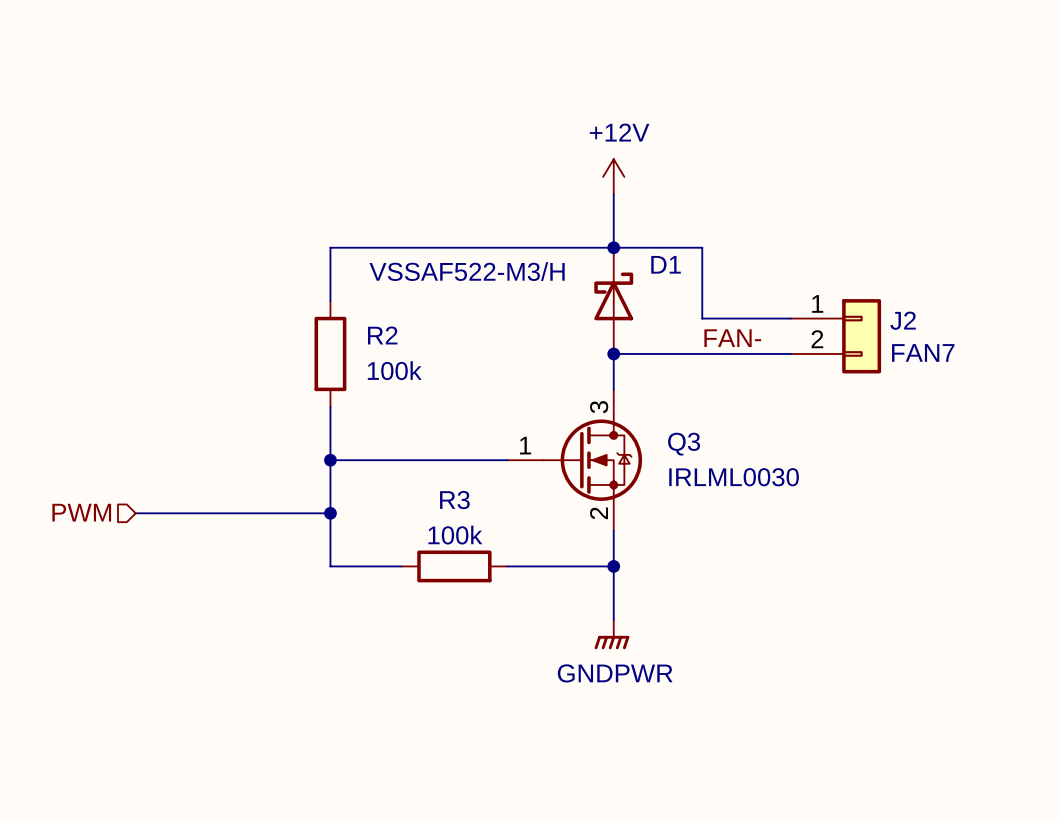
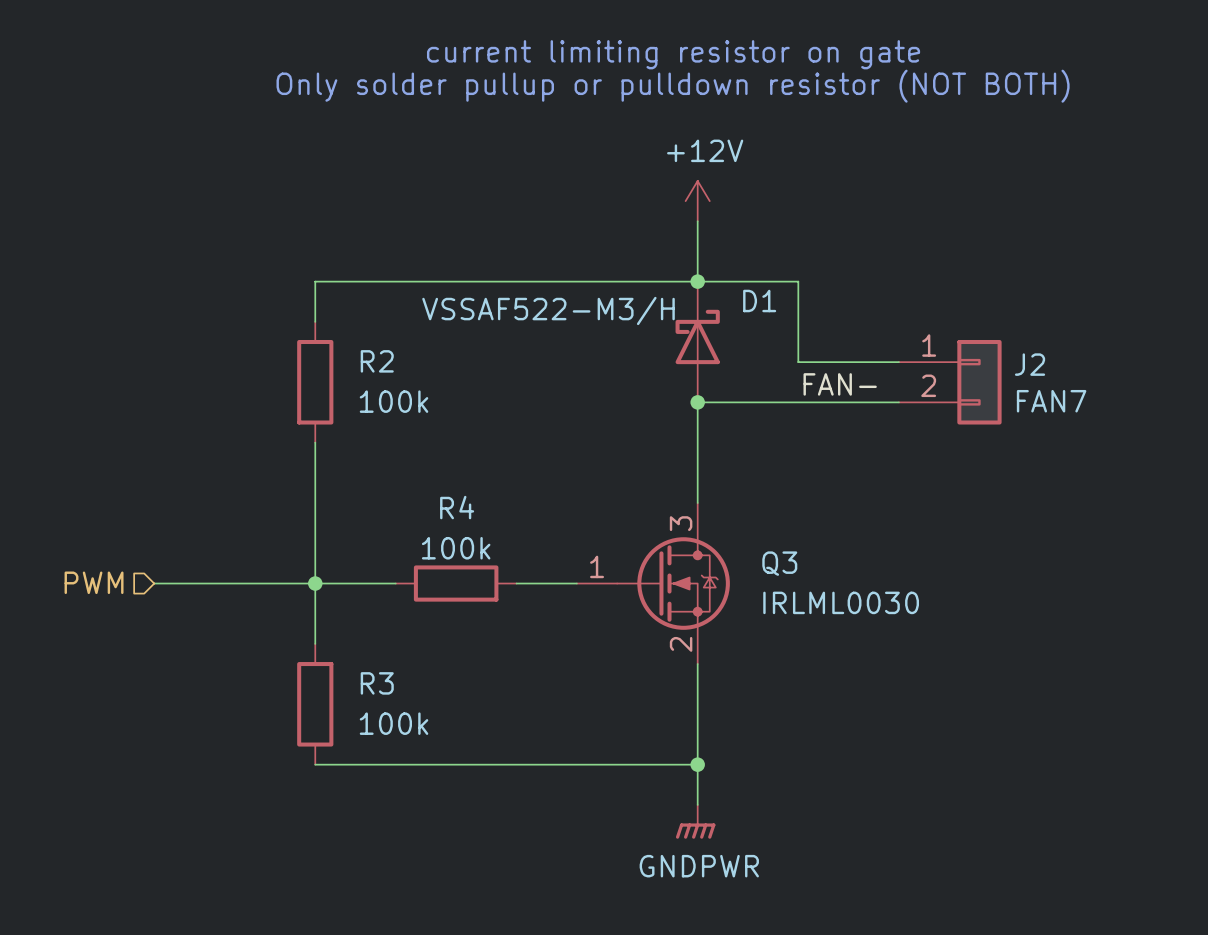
text: none -> current limiting resistor on gate (673, 54)
text: none -> Only solder pullup or pulldown resistor (NOT BOTH) (673, 86)
wire: (330, 247) (330, 300) -> (375, 281) (315, 281) (315, 321)
R2 position: (330, 353) -> (315, 382)
wire: none -> (315, 442) (315, 643)
wire: (330, 407) (330, 566) (401, 566) -> none
wire: (330, 460) (507, 460) -> none
junction: (330, 460) -> none
Q3 position: (574, 460) -> (653, 583)
junction: none -> (315, 583)
wire: none -> (375, 583) (395, 583)
junction: (330, 513) -> none
R4: none -> 100k (456, 583)
wire: none -> (516, 583) (576, 583)
R3 value position: 100k (455, 535) -> 100k (394, 723)
R3 rotation: 0° (454, 566) -> 90° clockwise (315, 704)
R3 position: (454, 566) -> (315, 704)
wire: (507, 566) (613, 566) -> none
junction: (613, 566) -> none
wire: none -> (697, 704) (697, 804)
power symbol position: GNDPWR (611, 634) -> GNDPWR (695, 821)
wire: none -> (315, 764) (697, 764)
junction: none -> (697, 764)

